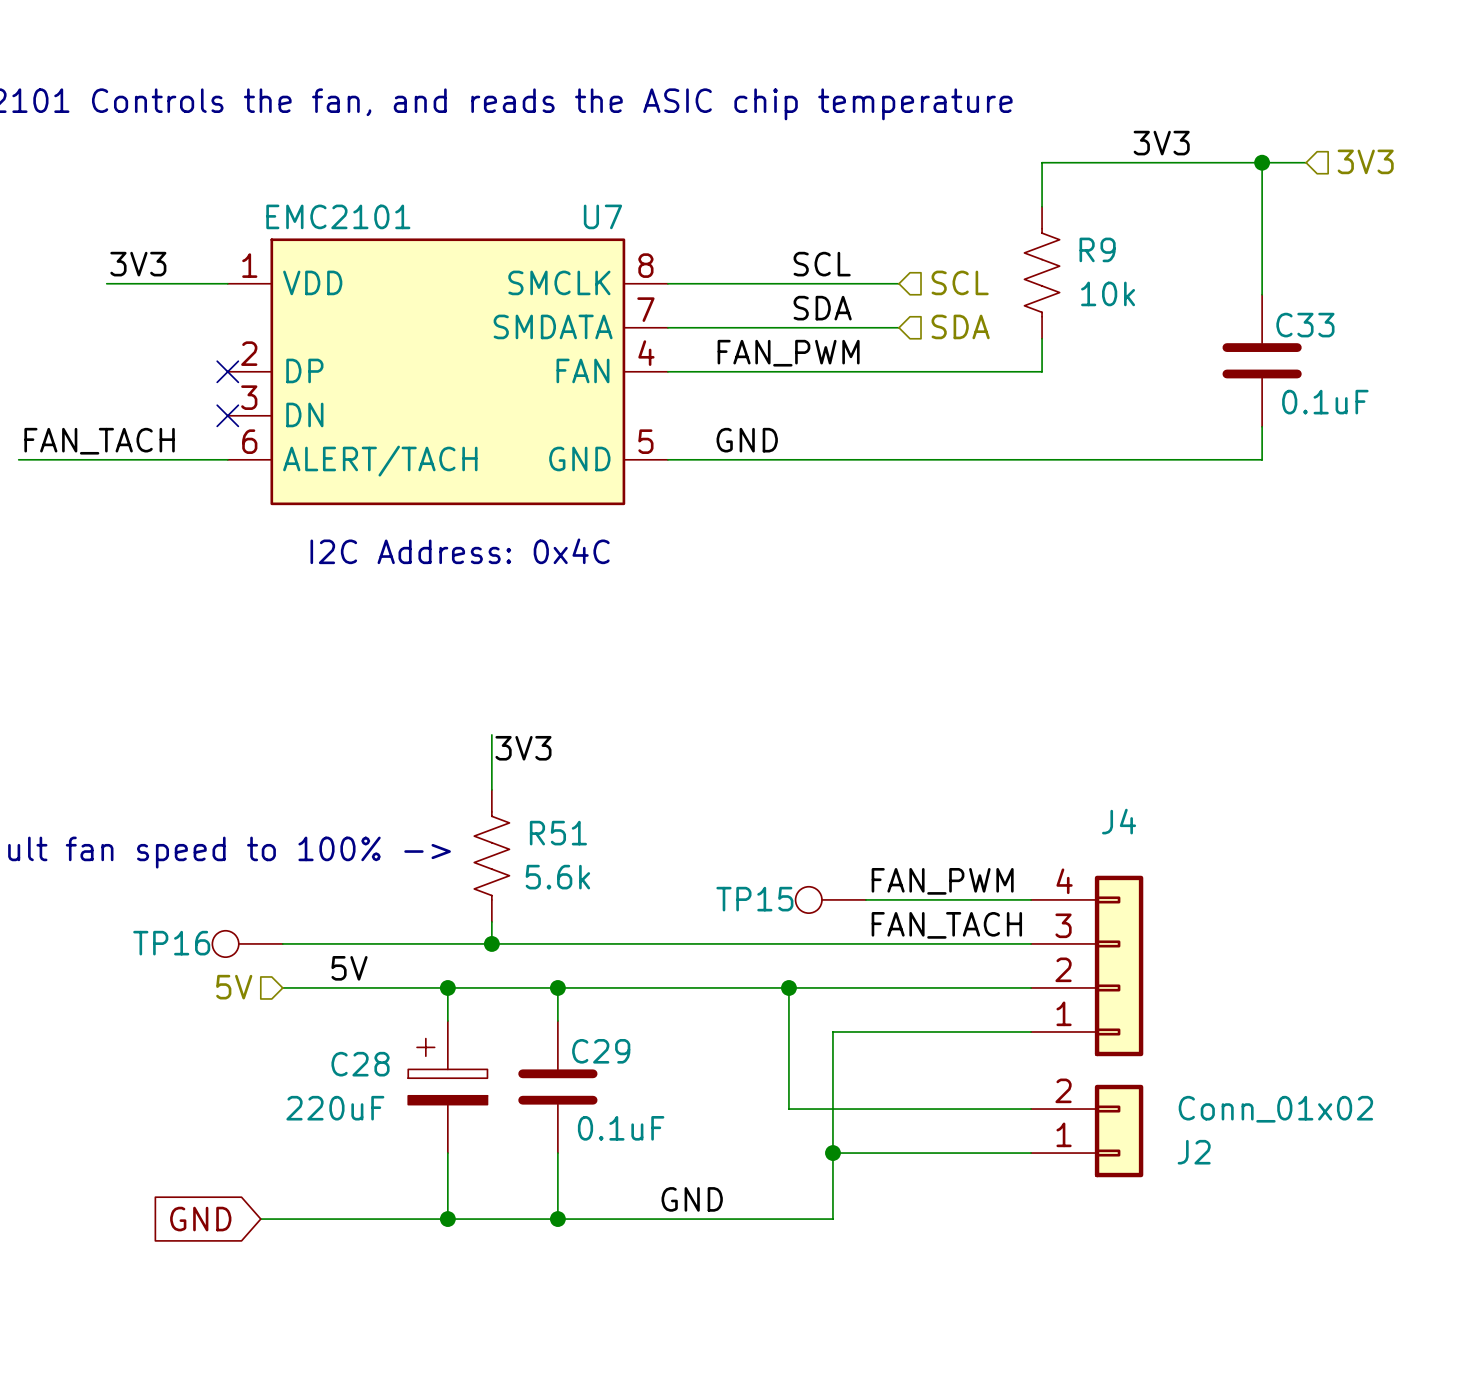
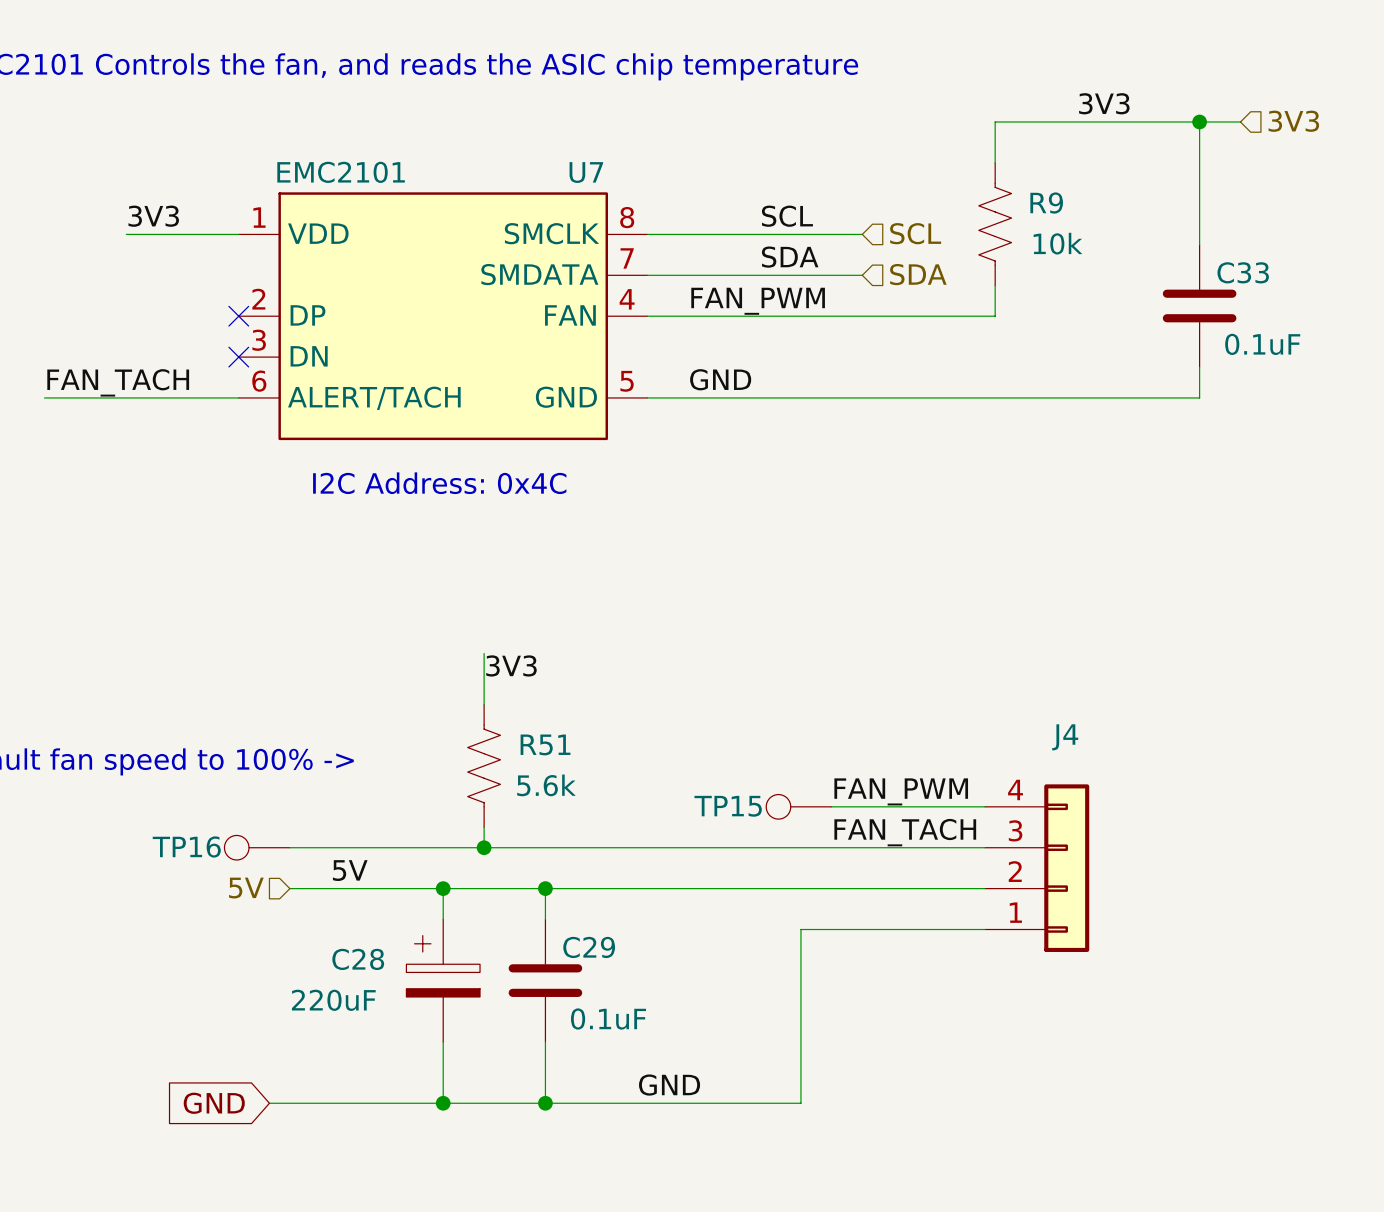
wire: (788, 987) (788, 1109) (1031, 1109) -> none
junction: (788, 987) -> none
J2: Conn_01x02 (1087, 1131) -> none
wire: (832, 1153) (1031, 1153) -> none
junction: (832, 1153) -> none

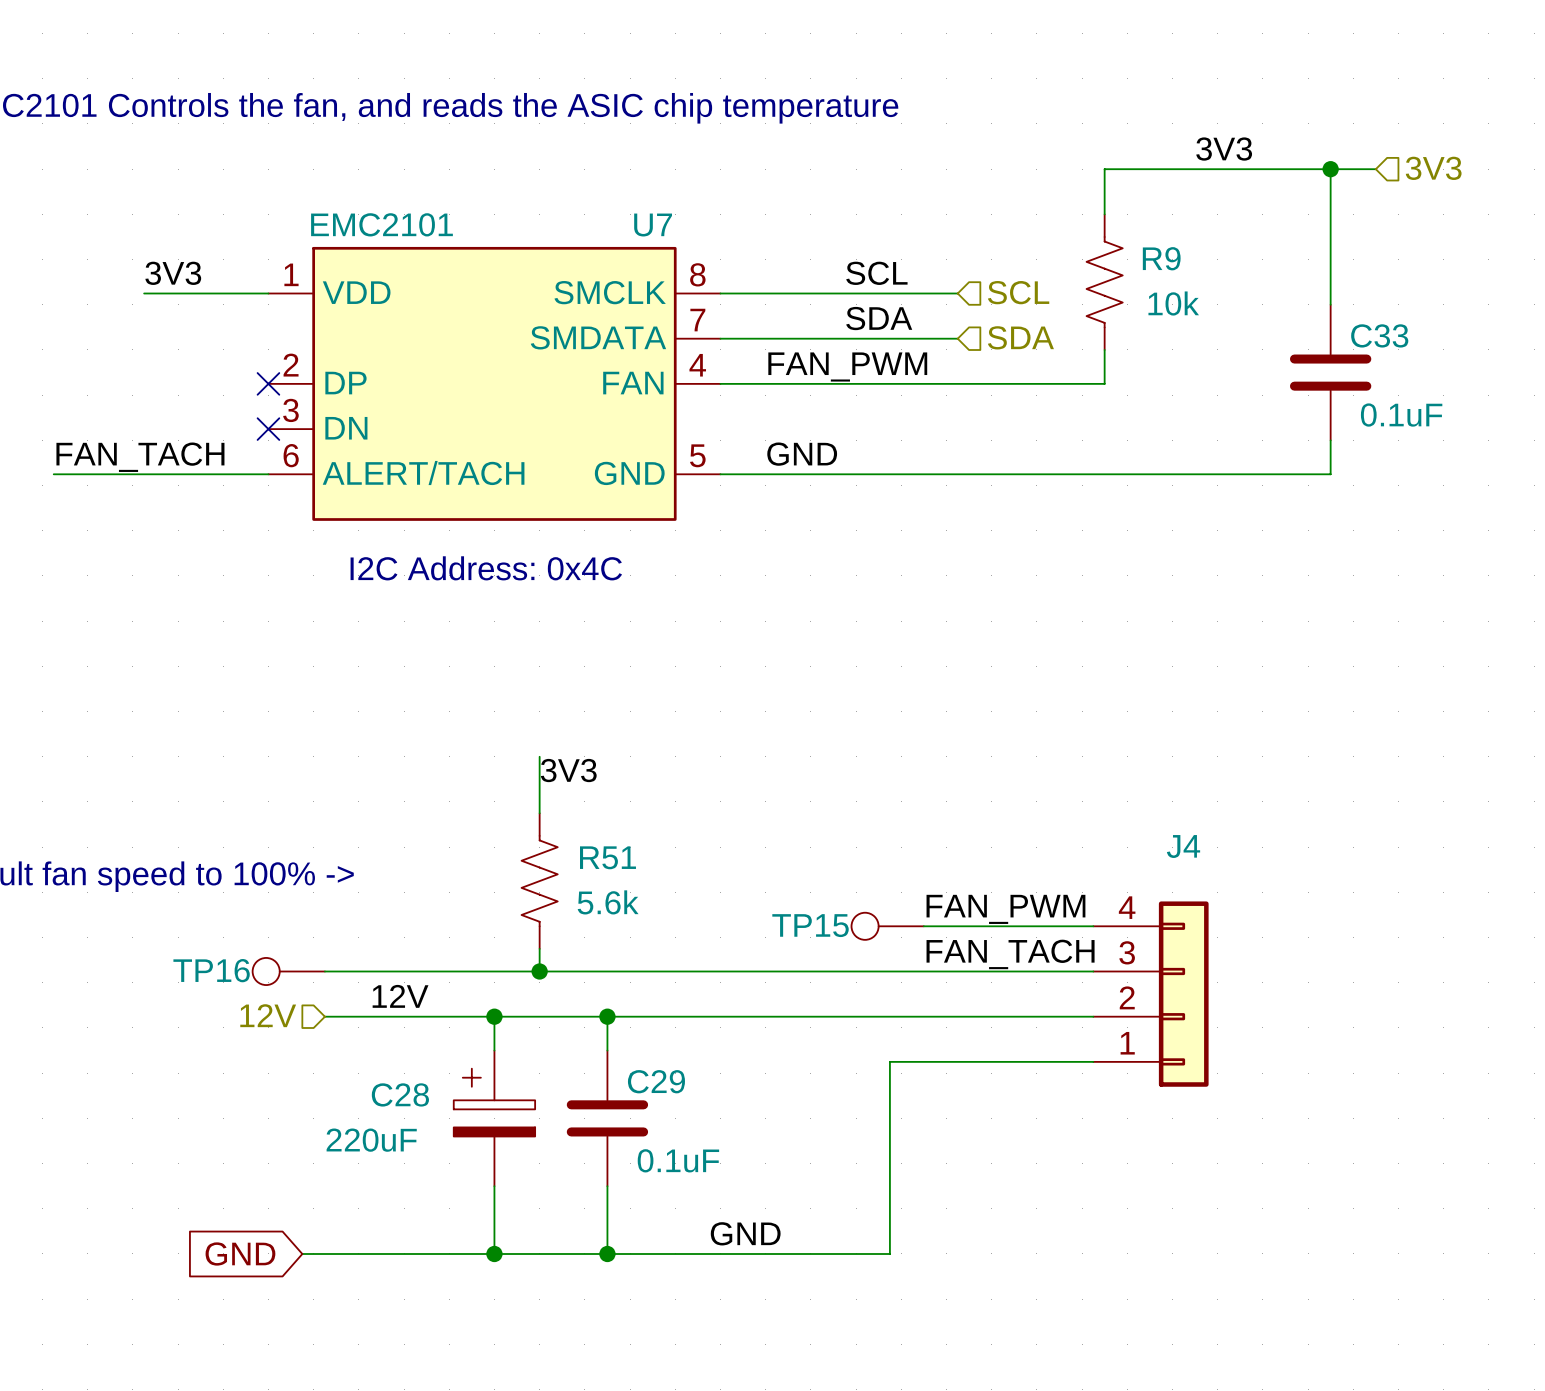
label: 5V (350, 870) -> 12V (400, 996)
hierarchical label: 5V (246, 888) -> 12V (268, 1015)

